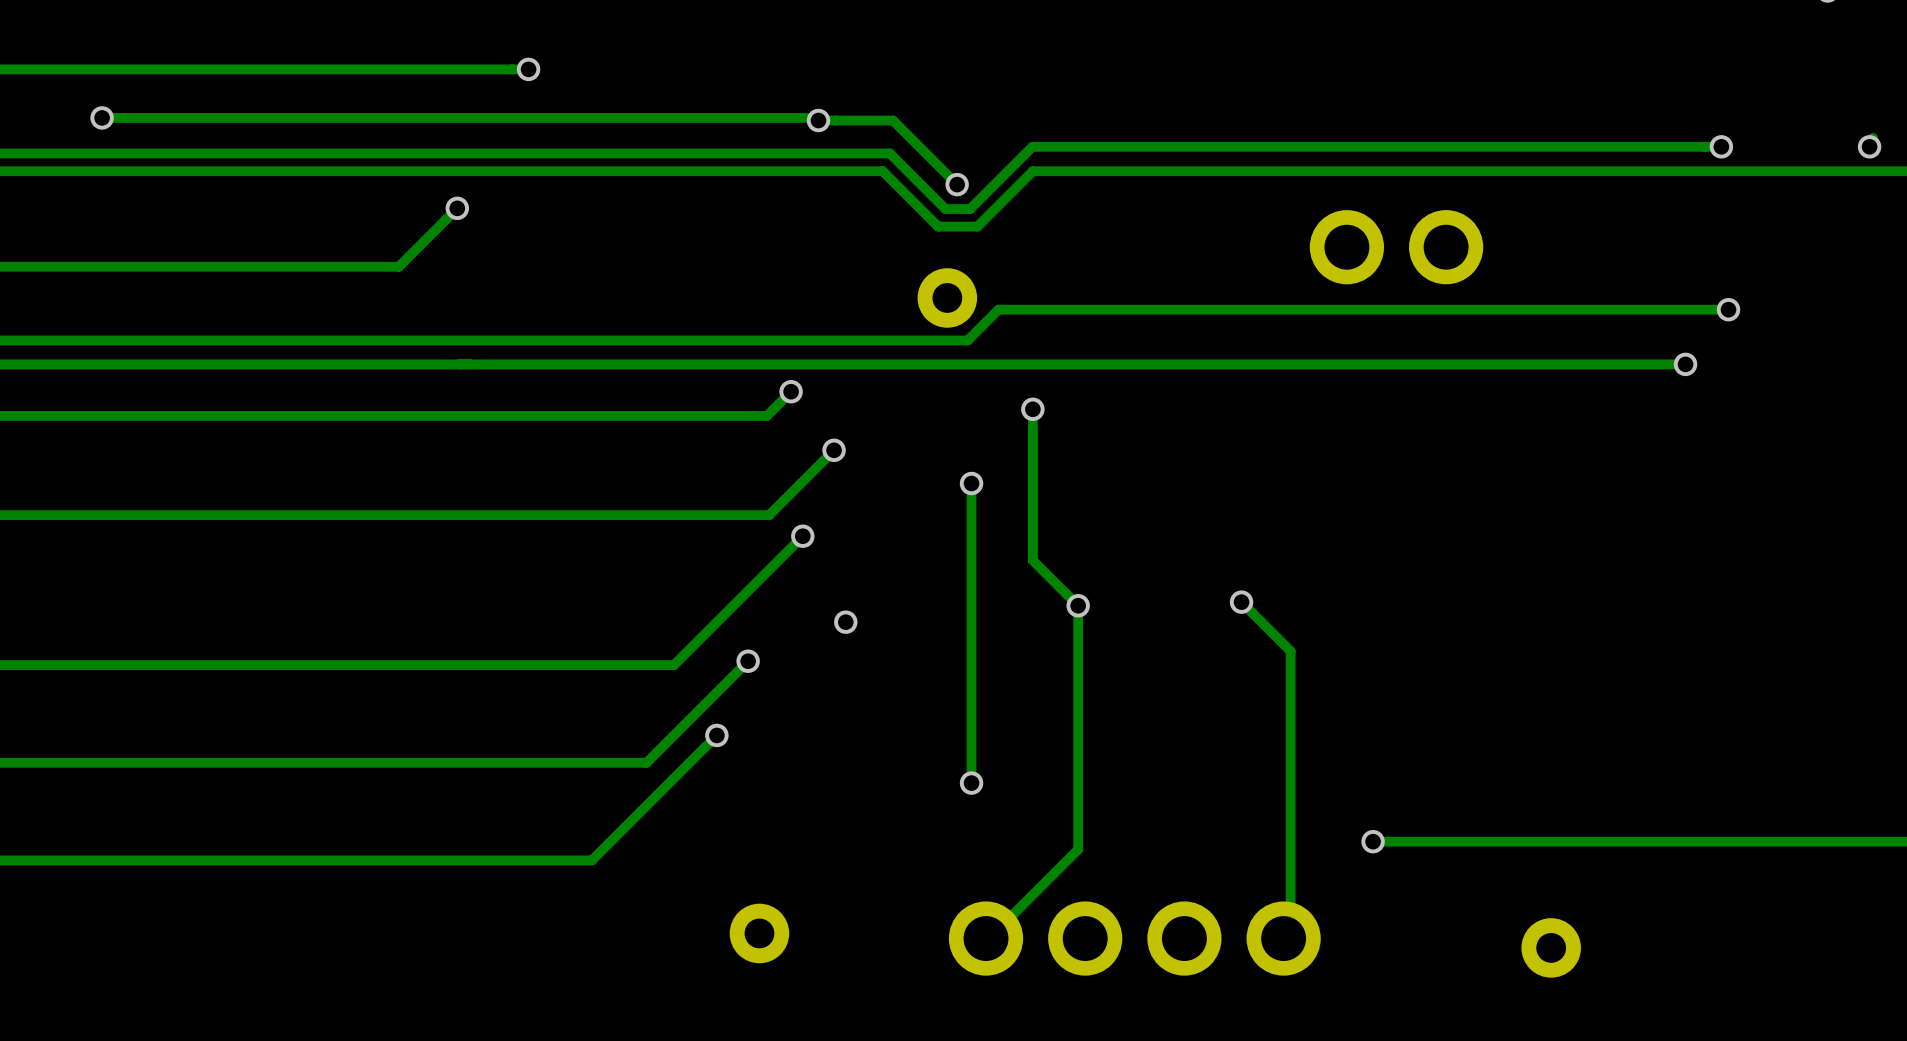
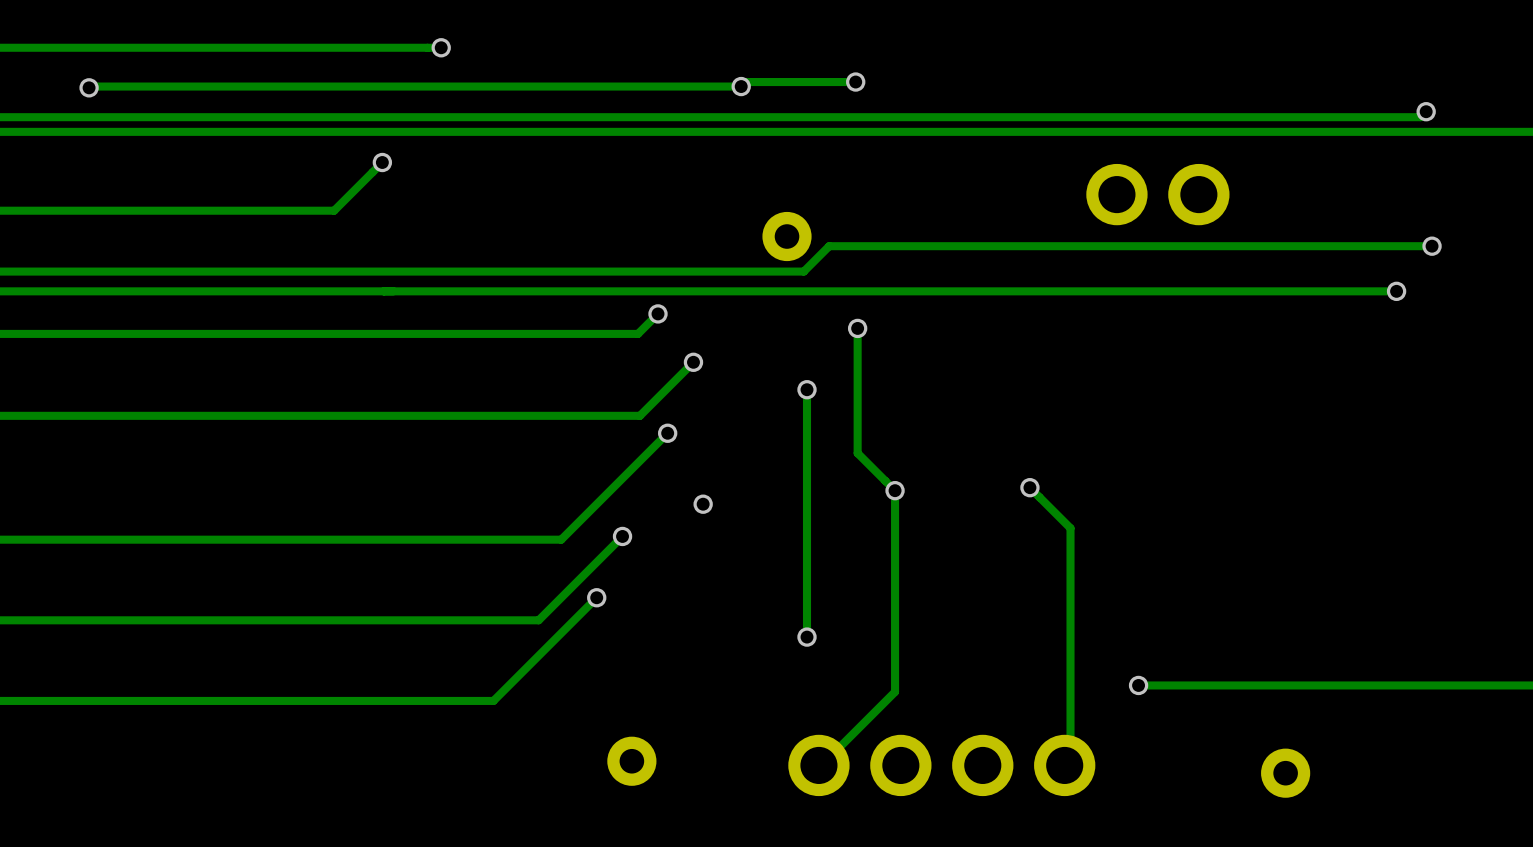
via: none -> (855, 82)
via: none -> (741, 86)
track: (102, 117) (815, 117) (818, 120) (893, 120) (957, 184) -> (89, 87) (741, 86) (745, 82) (855, 82)
via: (818, 120) -> none
track: (1721, 146) (1032, 146) (970, 209) (945, 209) (889, 153) -> (1426, 111) (1420, 117) (739, 117)
track: (1032, 171) (977, 226) (938, 226) (882, 171) -> (857, 131) (733, 131)
via: (957, 184) -> none

